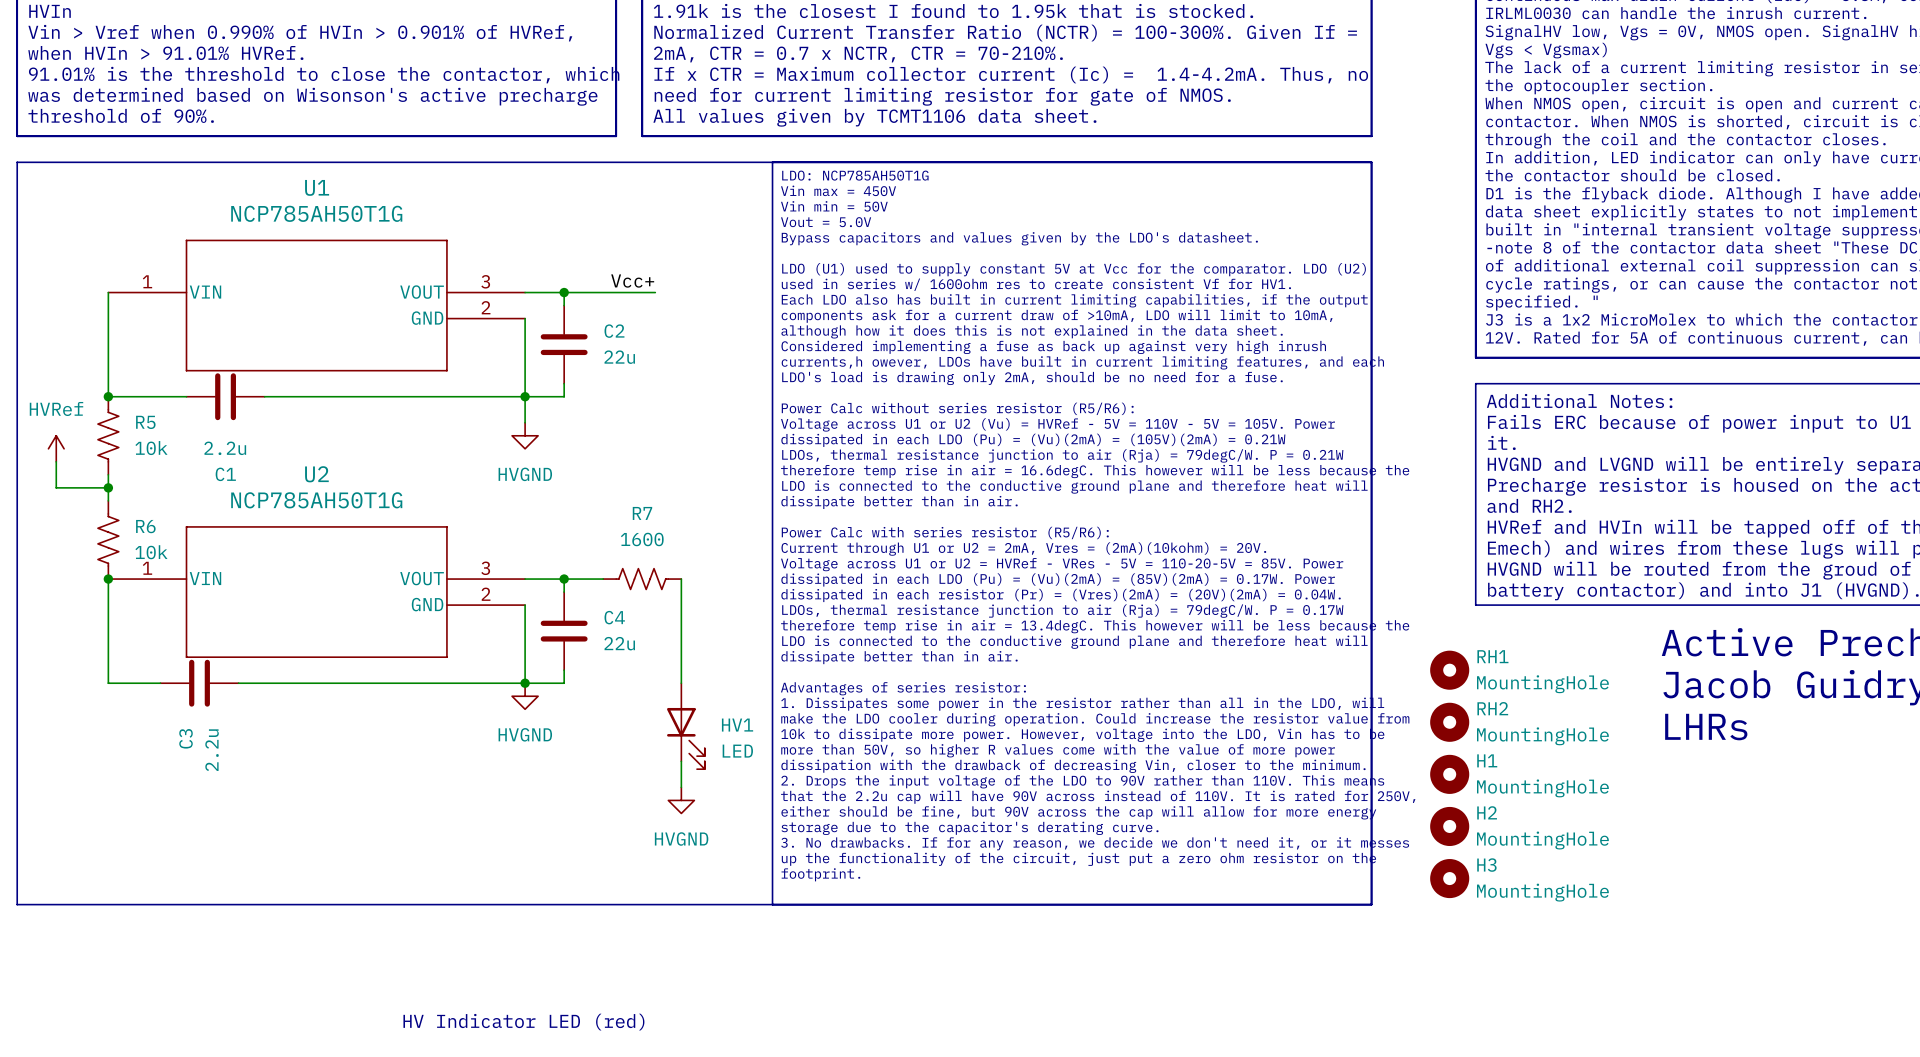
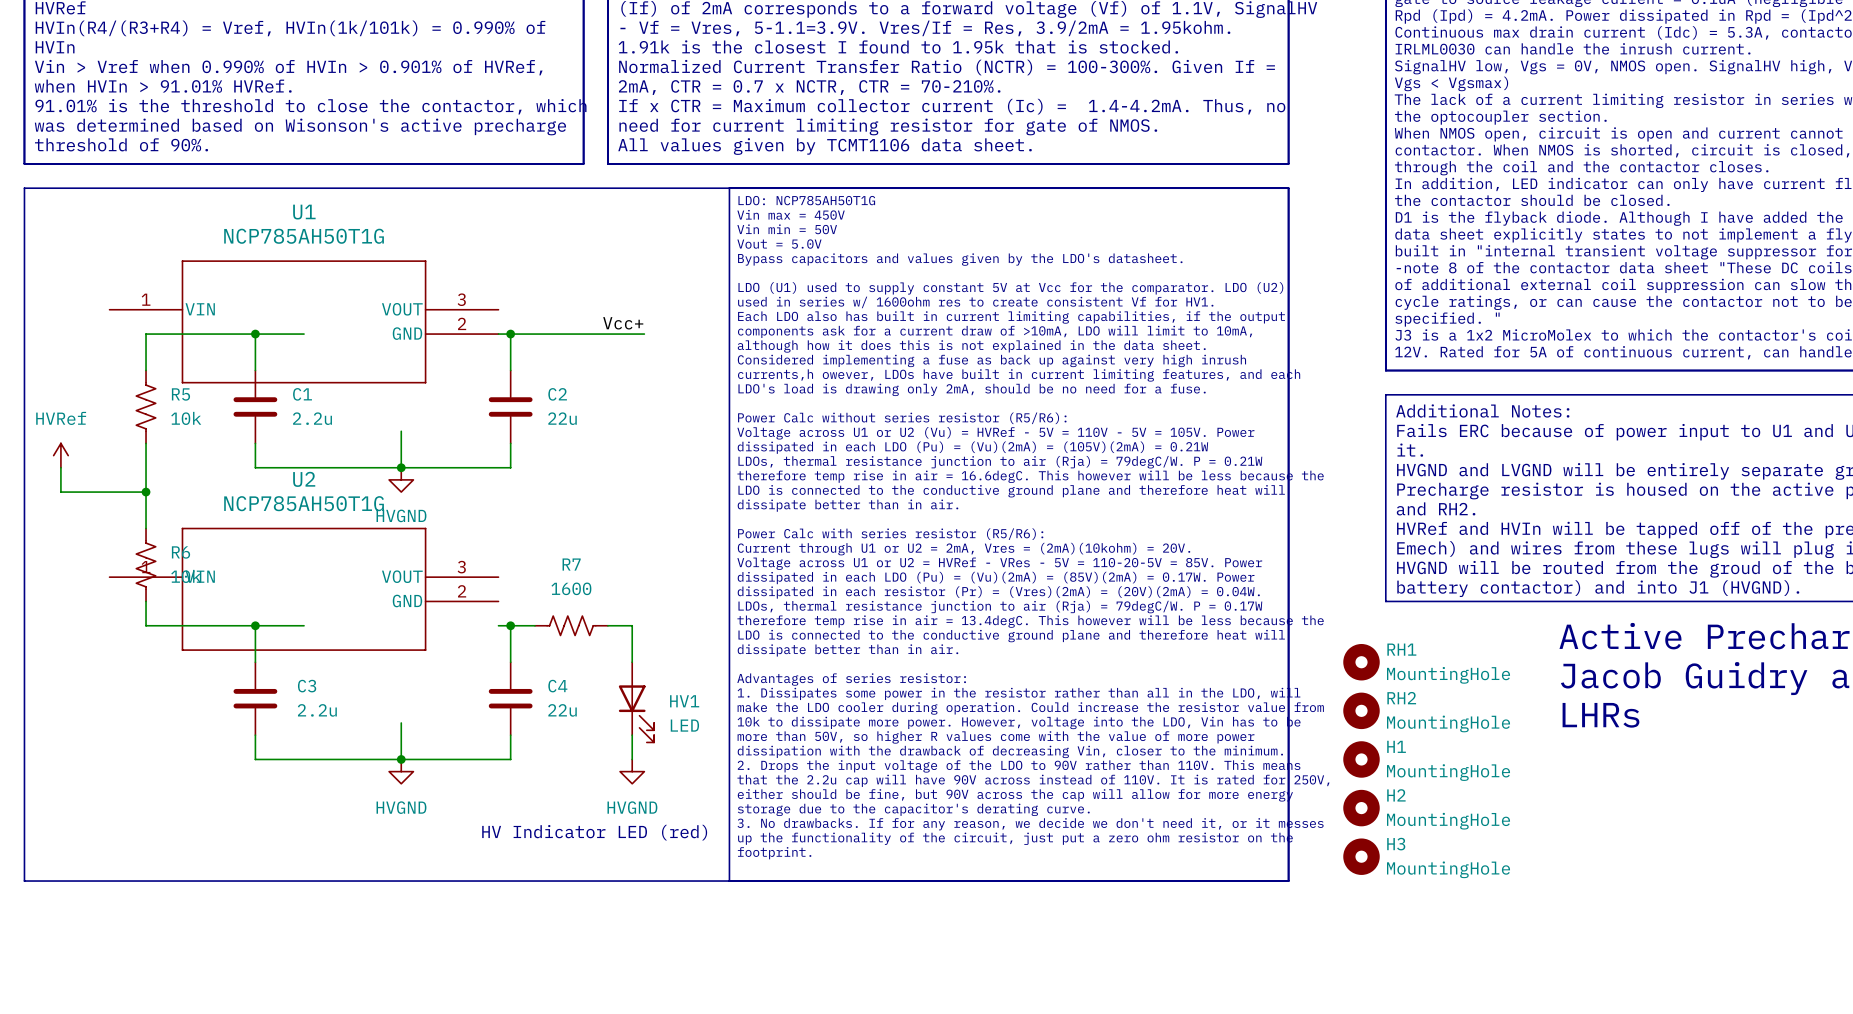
label position: Vcc+ (632, 281) -> Vcc+ (623, 323)
wire: (108, 292) (108, 396) (186, 396) -> none
wire: (525, 292) (655, 292) -> none
wire: (564, 292) (564, 305) -> none
junction position: (564, 292) -> (510, 334)
wire: none -> (255, 334) (255, 370)
junction: none -> (255, 334)
wire: none -> (304, 334) (146, 334) (146, 370)
wire: (525, 318) (525, 422) -> (498, 334) (644, 334)
wire: none -> (510, 334) (510, 370)
C2 position: (564, 344) -> (510, 406)
wire: (564, 383) (564, 396) (264, 396) -> none
junction: (108, 396) -> none
C1 rotation: 0° (225, 396) -> 90° clockwise (255, 406)
junction: (525, 396) -> none
wire: none -> (401, 431) (401, 467)
R5 position: (108, 435) -> (146, 406)
wire: none -> (146, 443) (146, 528)
wire: none -> (255, 443) (255, 467) (510, 467) (510, 443)
power symbol position: HVGND (525, 435) -> HVGND (401, 479)
C1 value position: 2.2u (225, 448) -> 2.2u (312, 418)
junction: none -> (401, 467)
wire: (108, 474) (108, 500) -> none
C1 name position: C1 (225, 474) -> C1 (302, 394)
wire: none -> (109, 492) (146, 492)
junction position: (108, 487) -> (146, 492)
R6 position: (108, 539) -> (146, 564)
wire: (108, 579) (108, 683) (160, 683) -> none
junction: (108, 579) -> none
wire: (525, 579) (603, 579) -> none
wire: (564, 579) (564, 592) -> none
junction: (564, 579) -> none
R7 position: (642, 579) -> (571, 625)
wire: (681, 579) (681, 683) -> none
wire: none -> (146, 601) (146, 625) (304, 625)
wire: (525, 605) (525, 683) -> none
wire: none -> (255, 625) (255, 662)
junction: none -> (255, 625)
wire: none -> (498, 625) (534, 625)
wire: none -> (510, 625) (510, 662)
junction: none -> (510, 625)
C4 position: (564, 631) -> (510, 698)
wire: none -> (607, 625) (632, 625) (632, 662)
wire: (564, 670) (564, 683) (238, 683) -> none
C3 rotation: 0° (199, 683) -> 90° clockwise (255, 698)
C3 position: (199, 683) -> (255, 698)
junction: (525, 683) -> none
power symbol: HVGND (525, 696) -> none
HV1 position: (685, 726) -> (636, 702)
wire: none -> (401, 723) (401, 759)
C3 name position: C3 (186, 738) -> C3 (307, 686)
wire: none -> (255, 735) (255, 759) (510, 759) (510, 735)
C3 value position: 2.2u (212, 750) -> 2.2u (317, 710)
wire: (681, 761) (681, 787) -> (632, 735) (632, 759)
junction: none -> (401, 759)
power symbol: none -> HVGND (401, 771)
power symbol position: HVGND (681, 800) -> HVGND (632, 771)
text position: HV Indicator LED (red) (523, 1022) -> HV Indicator LED (red) (594, 832)

